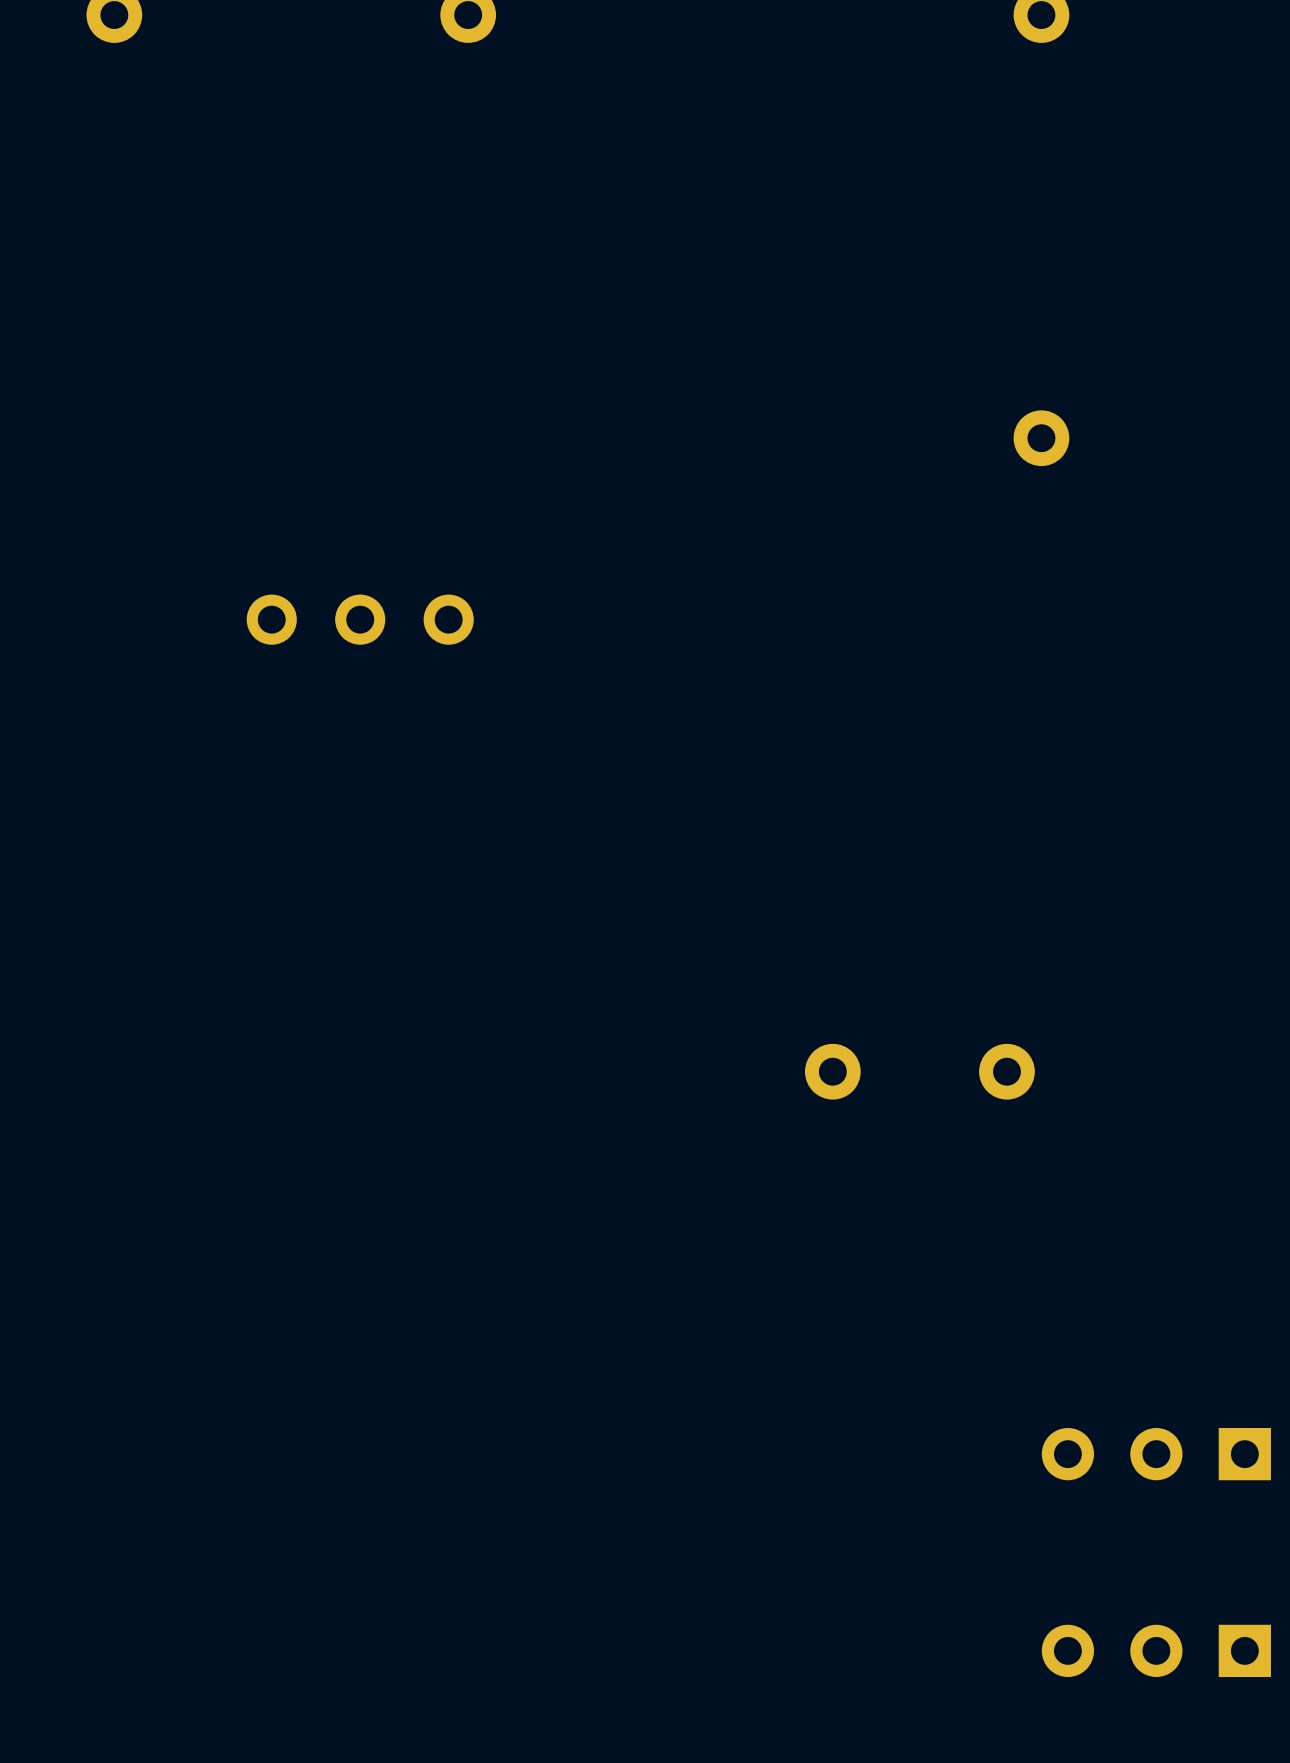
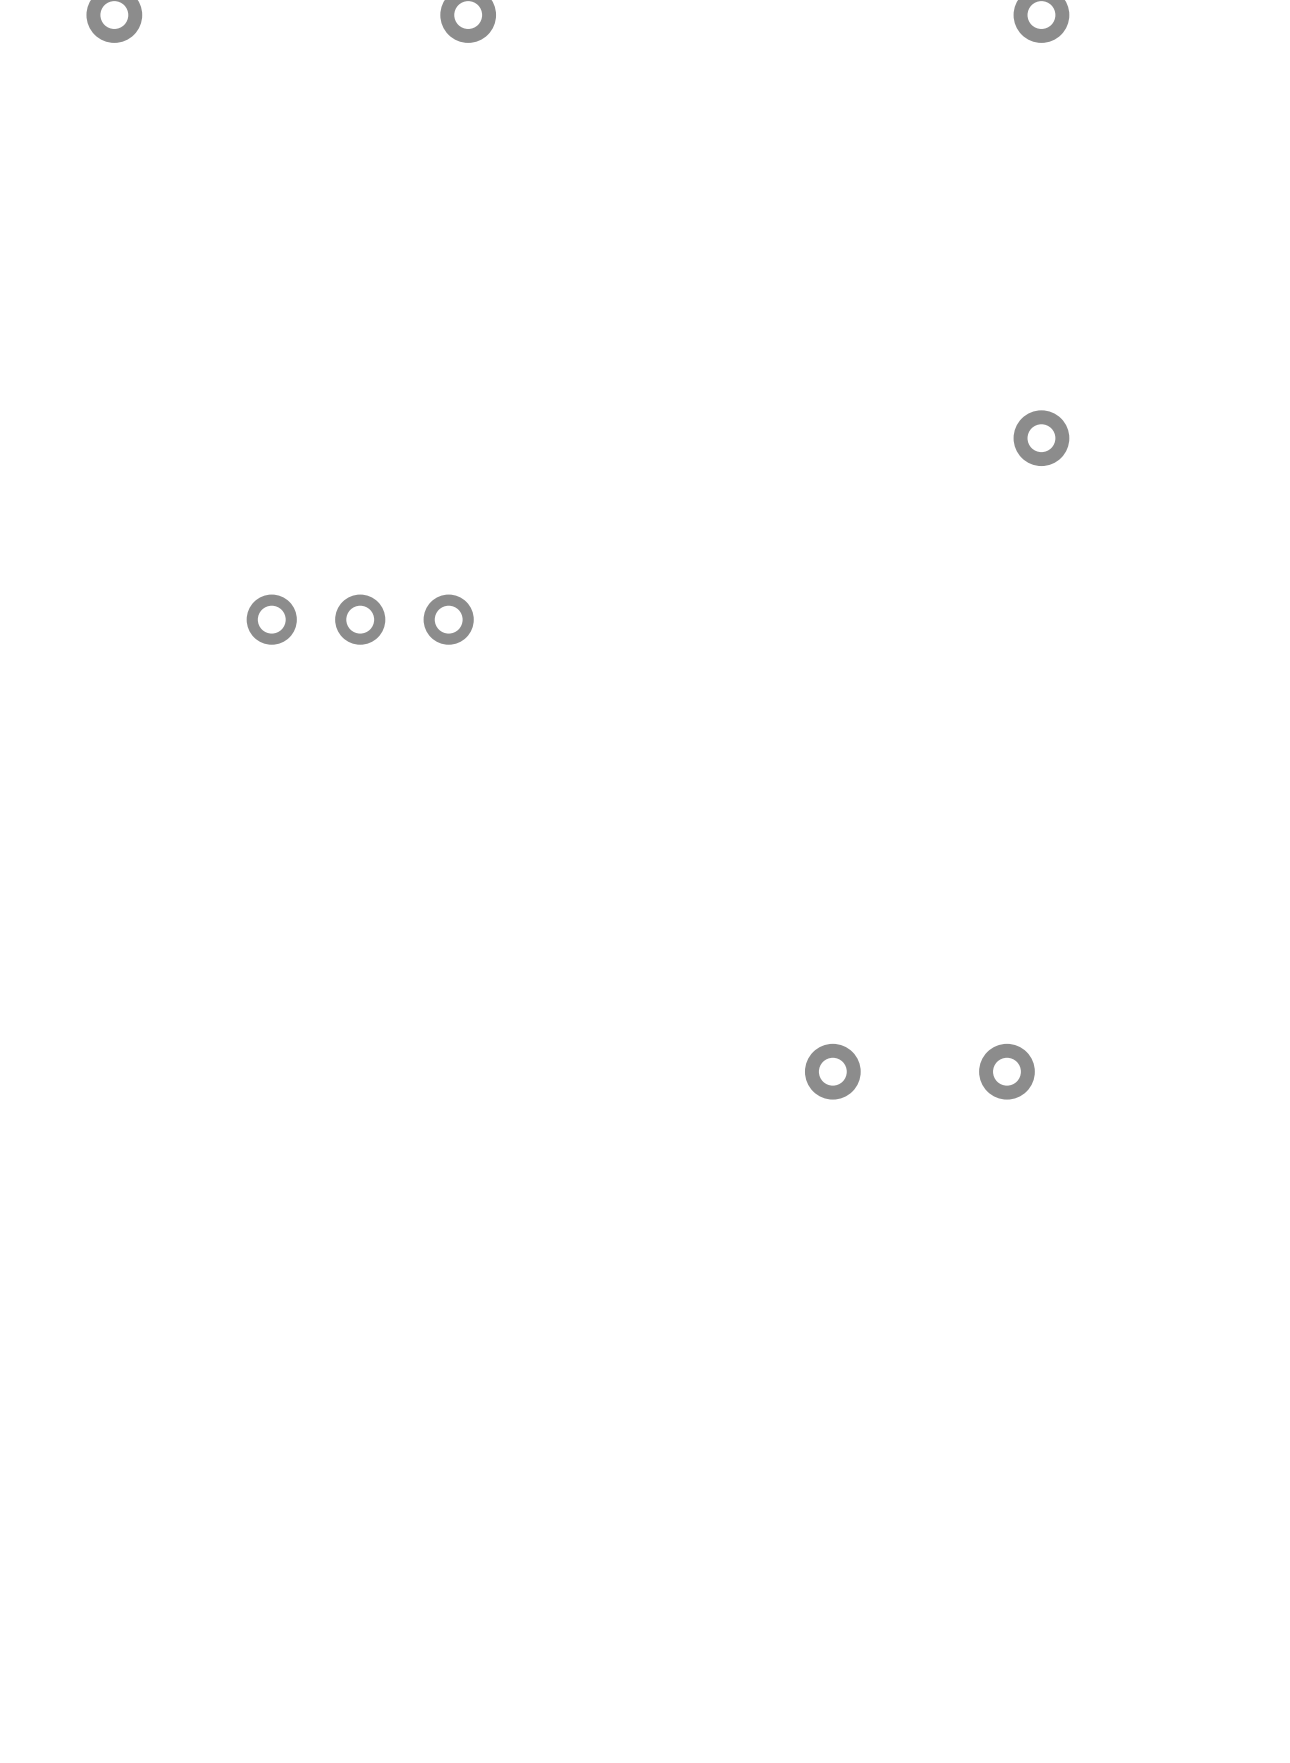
part: (1156, 1454) -> none
part: (1156, 1650) -> none

